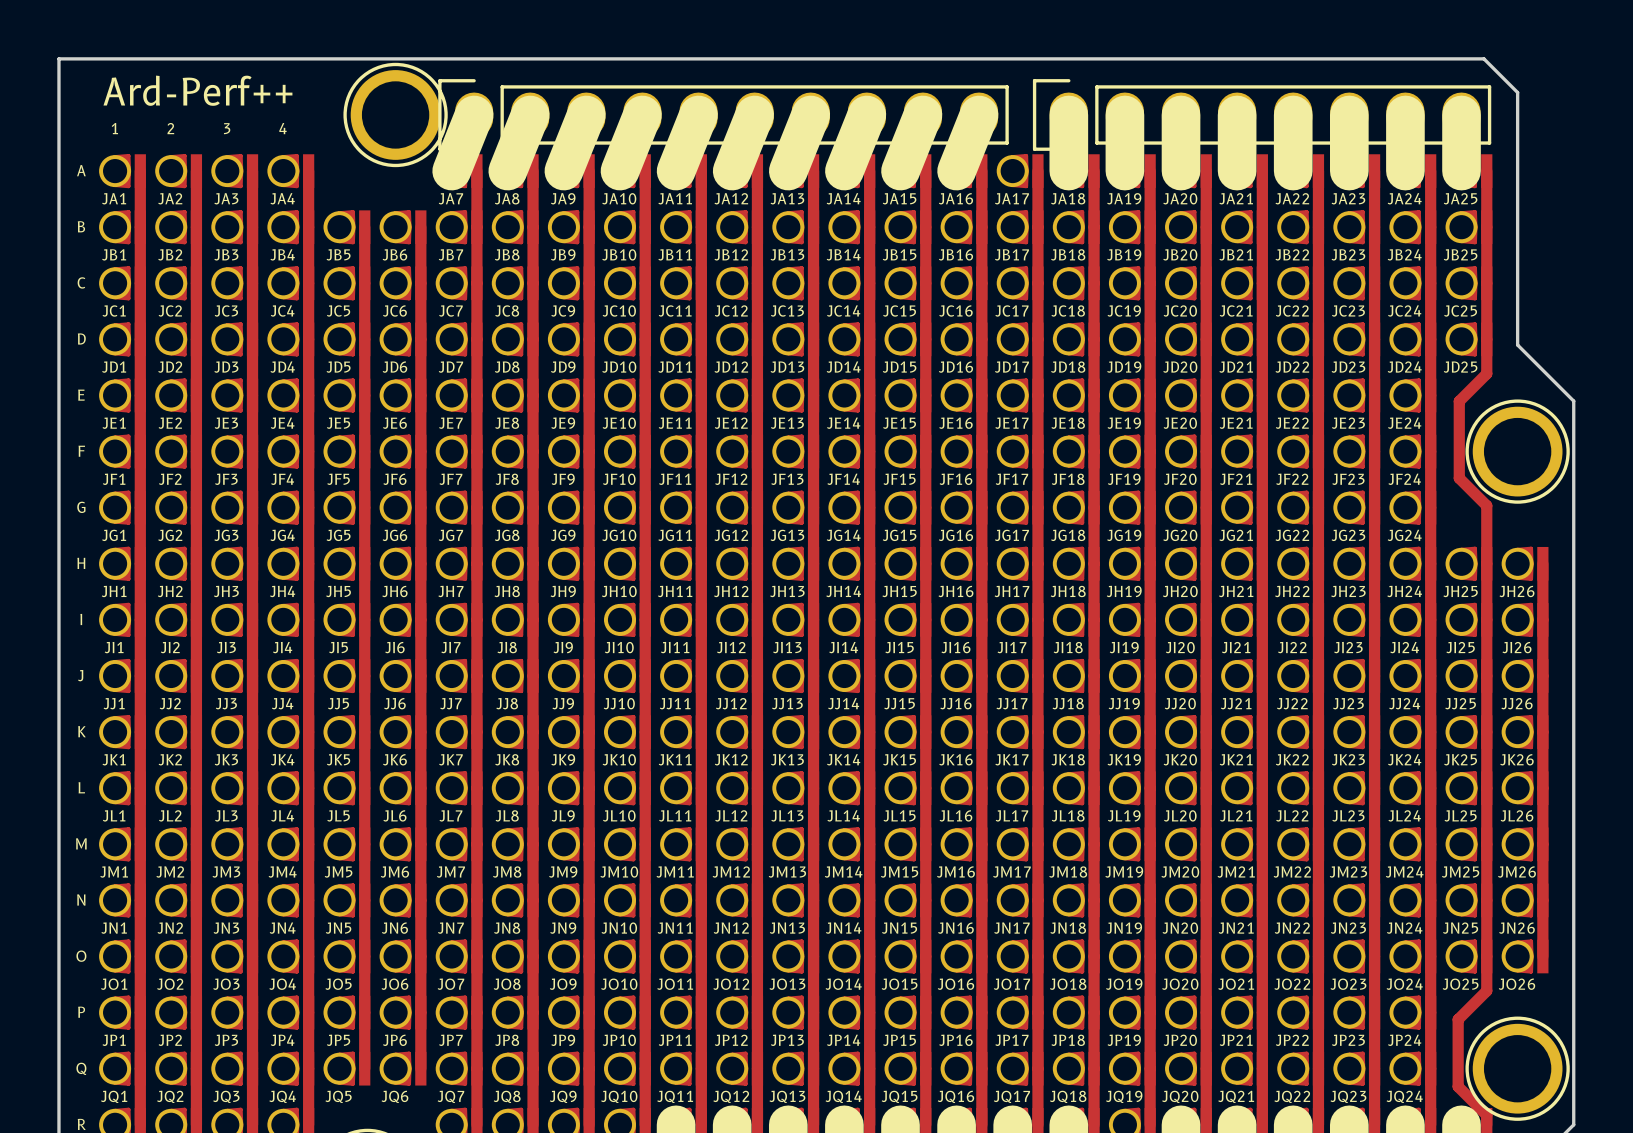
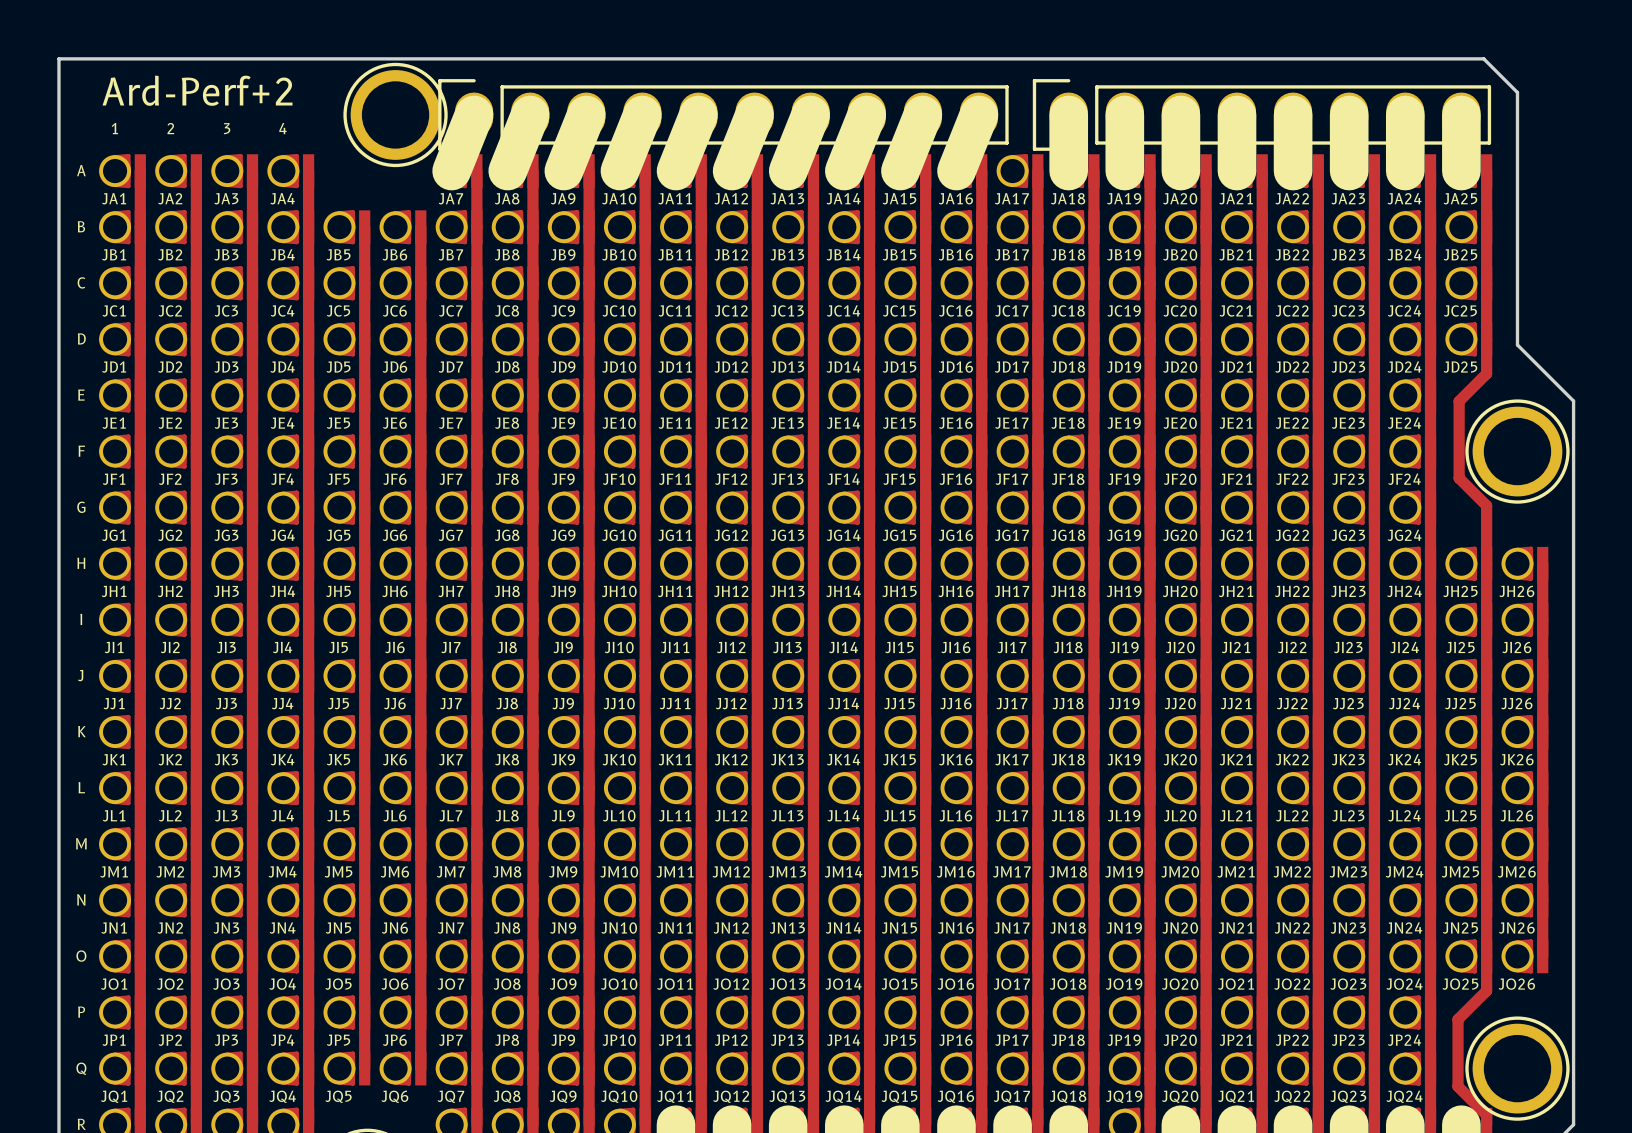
text: Ard-Perf++ (197, 90) -> Ard-Perf+2 (197, 90)

